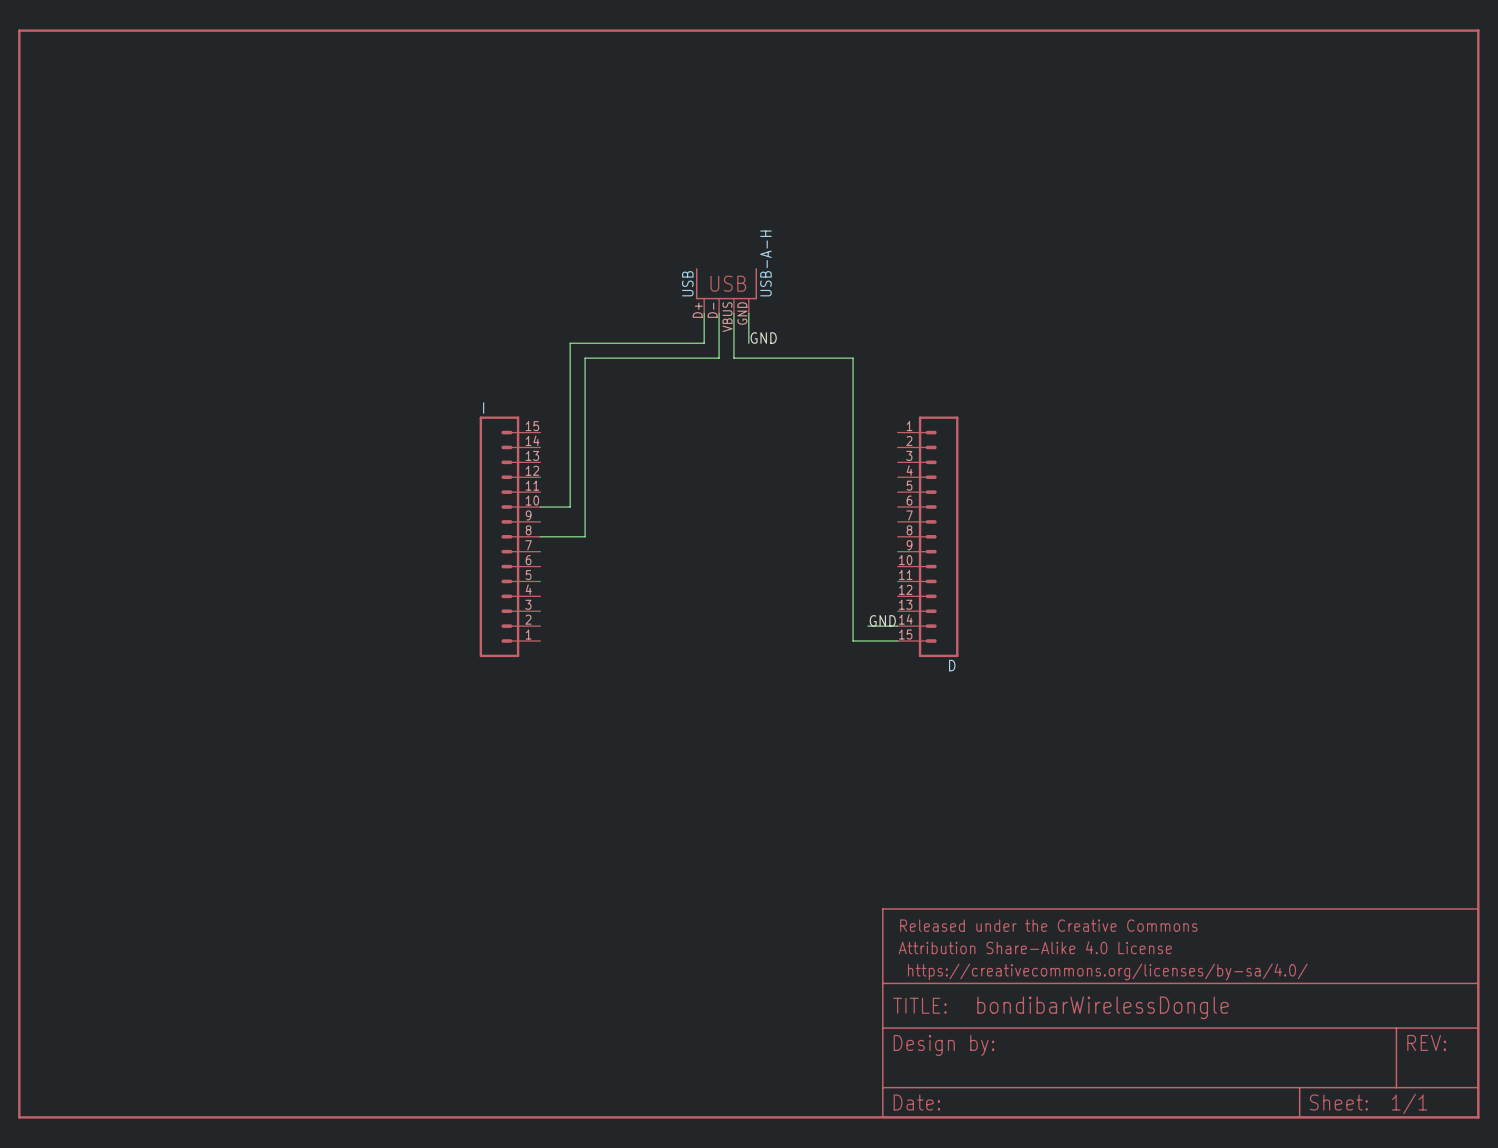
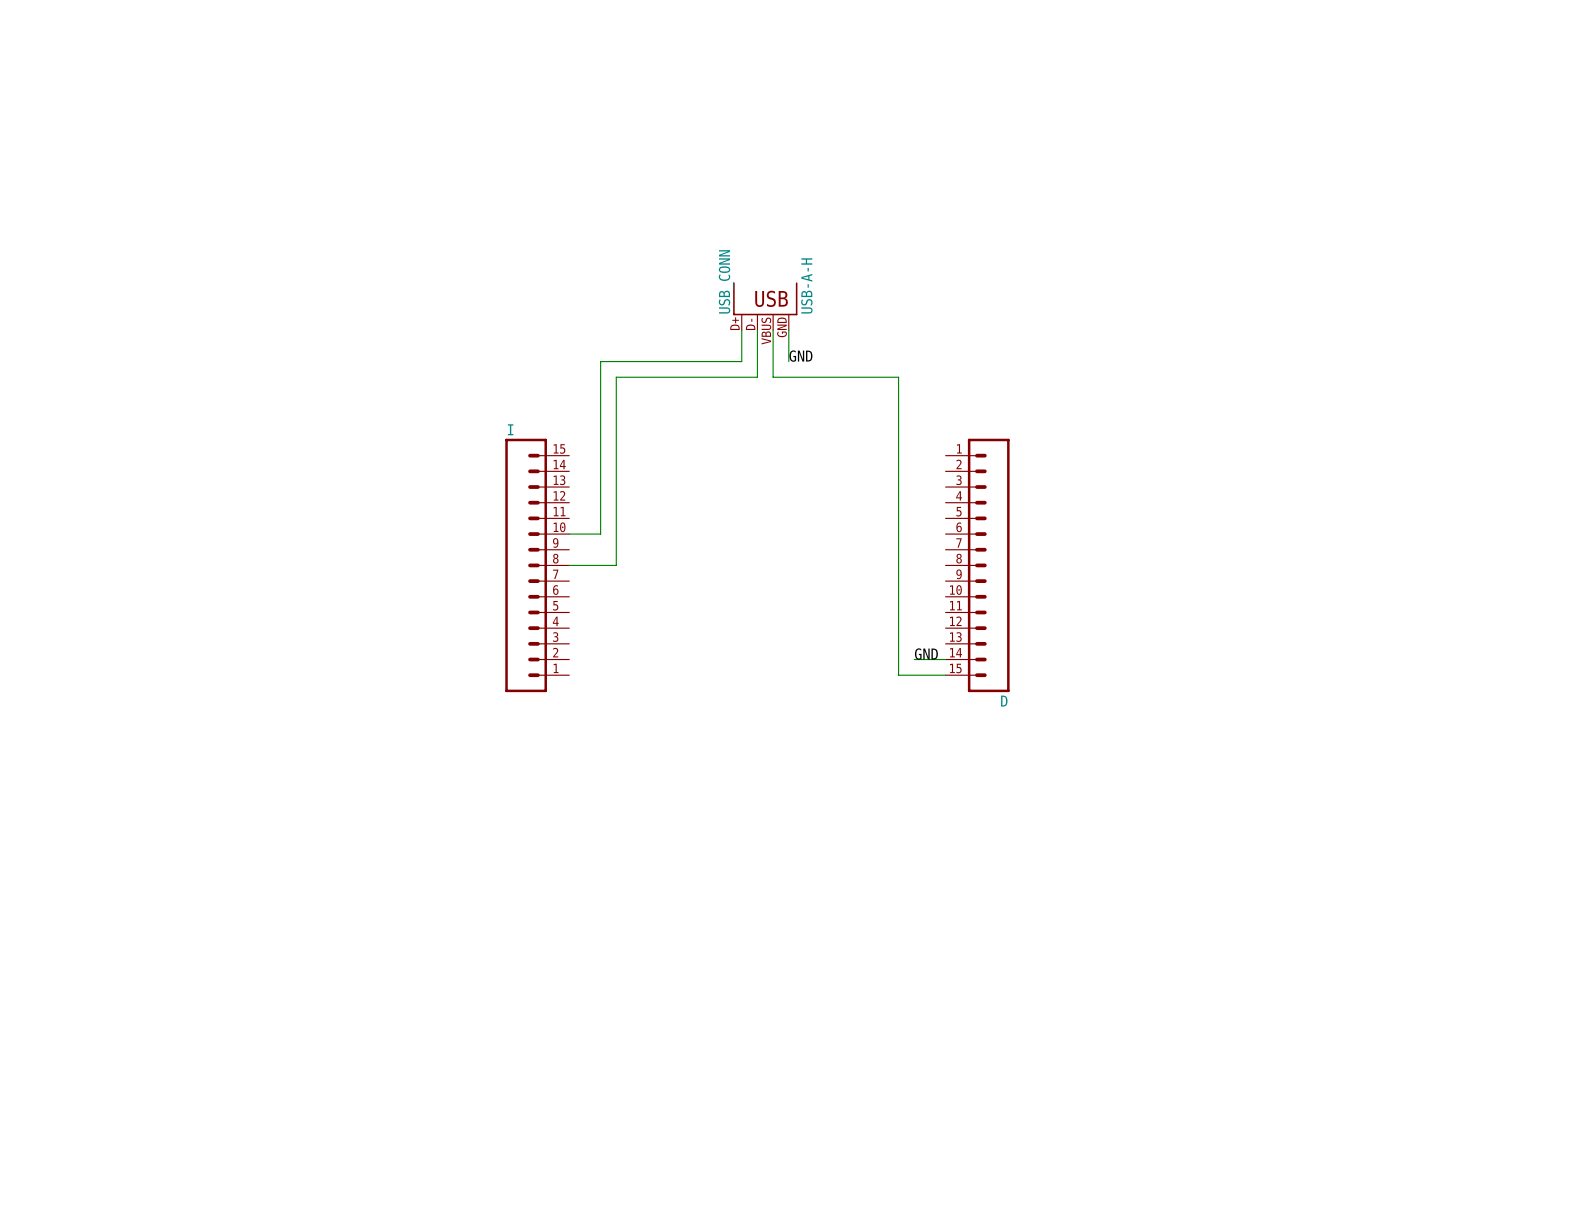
USB name: USB (687, 283) -> USB_CONN (726, 281)
part: (748, 574) -> none
part: (1180, 1013) -> none

